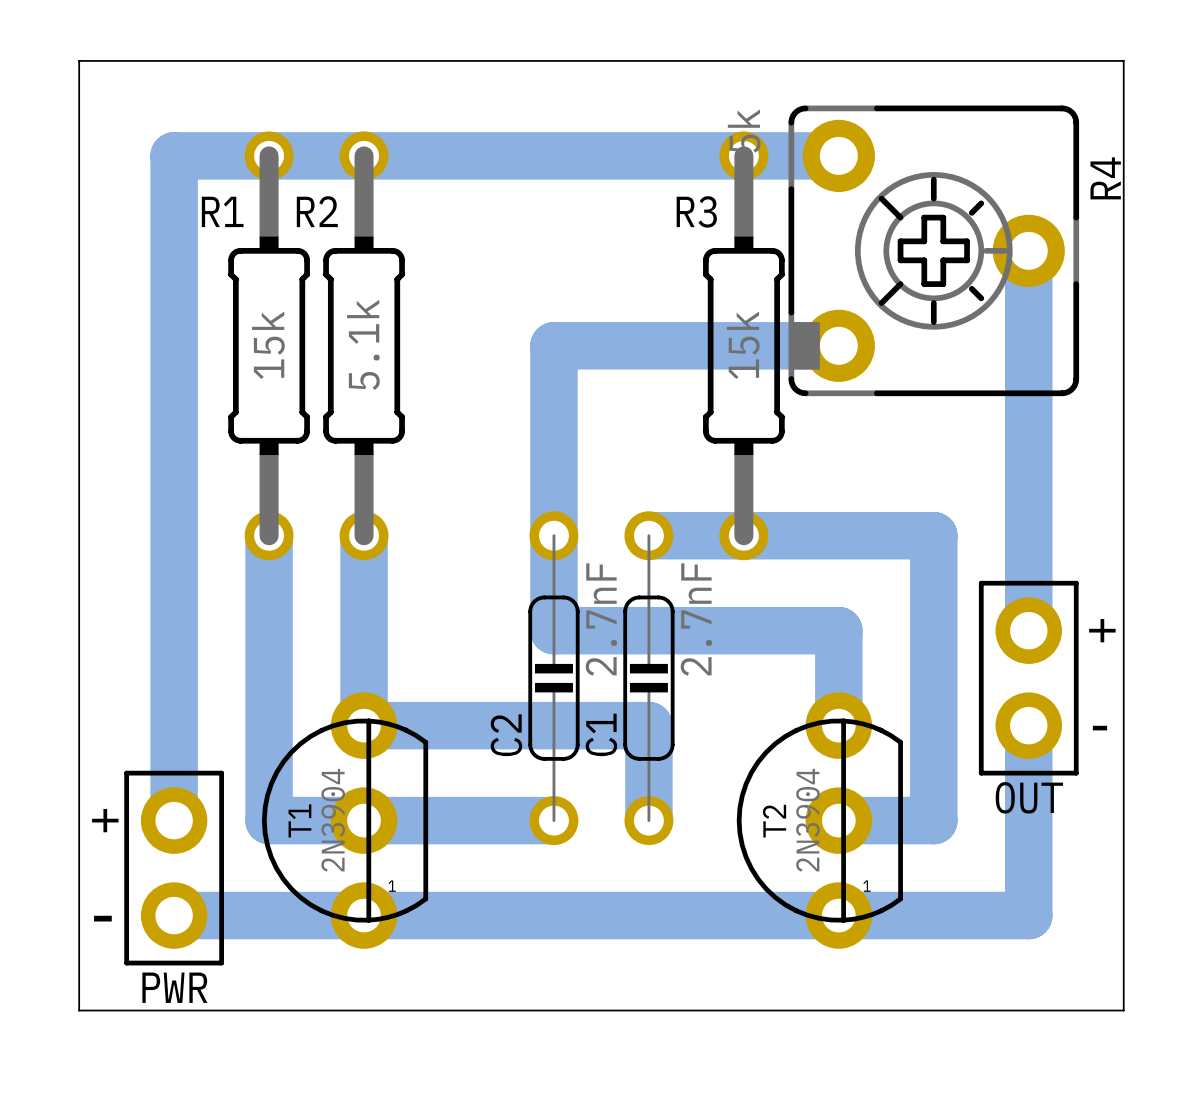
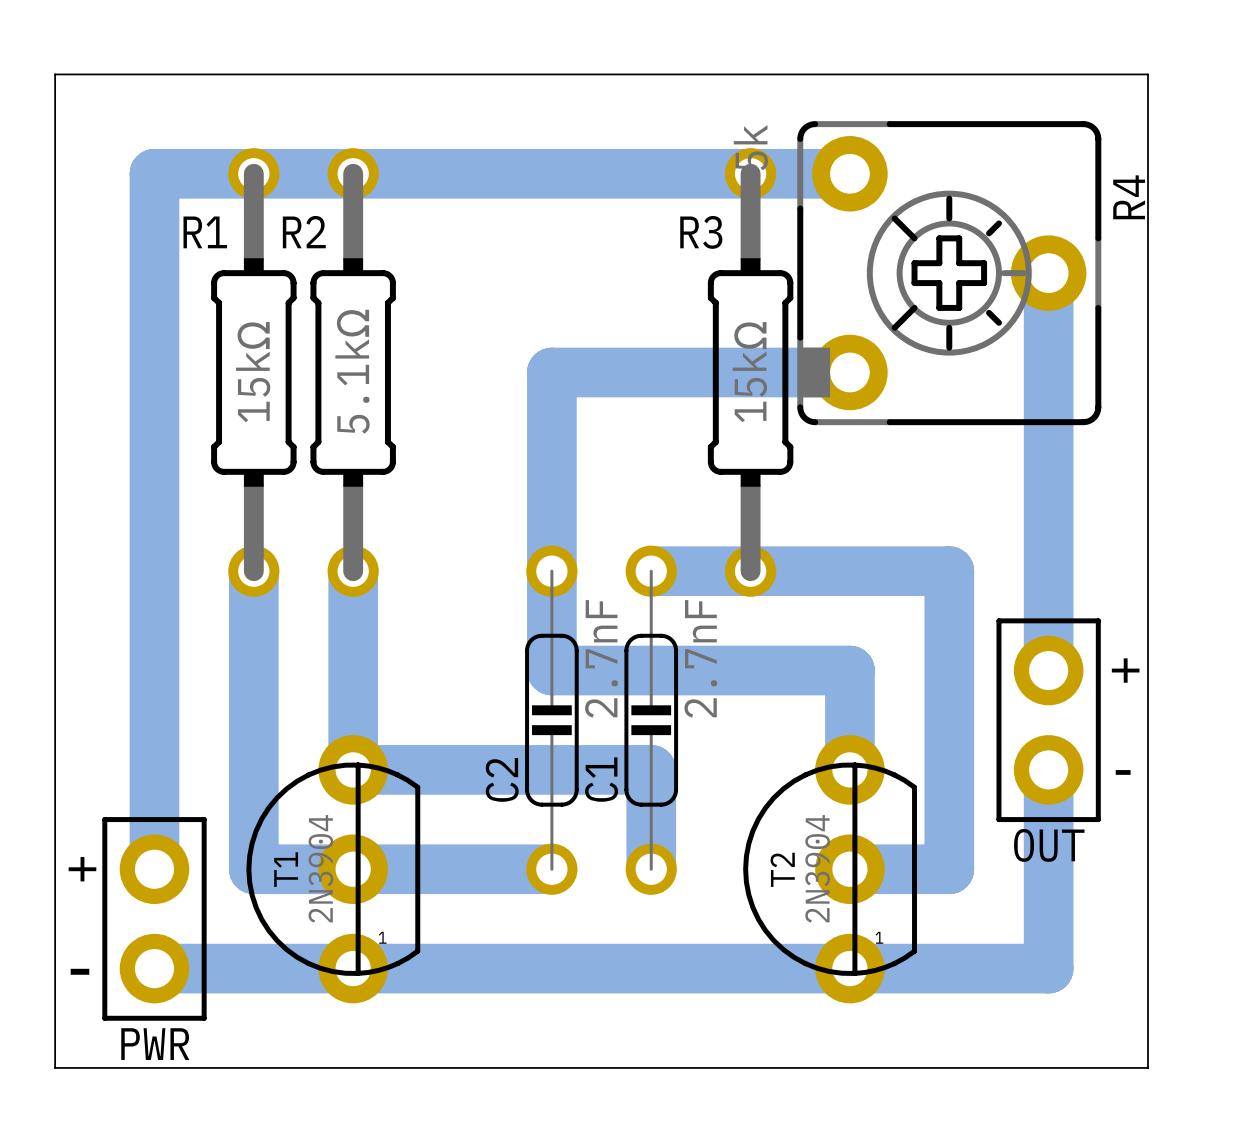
R2 value: 5.1k (363, 344) -> 5.1kΩ (352, 371)
R1 value: 15k (268, 345) -> 15kΩ (253, 372)
R3 value: 15k (743, 345) -> 15kΩ (749, 372)

